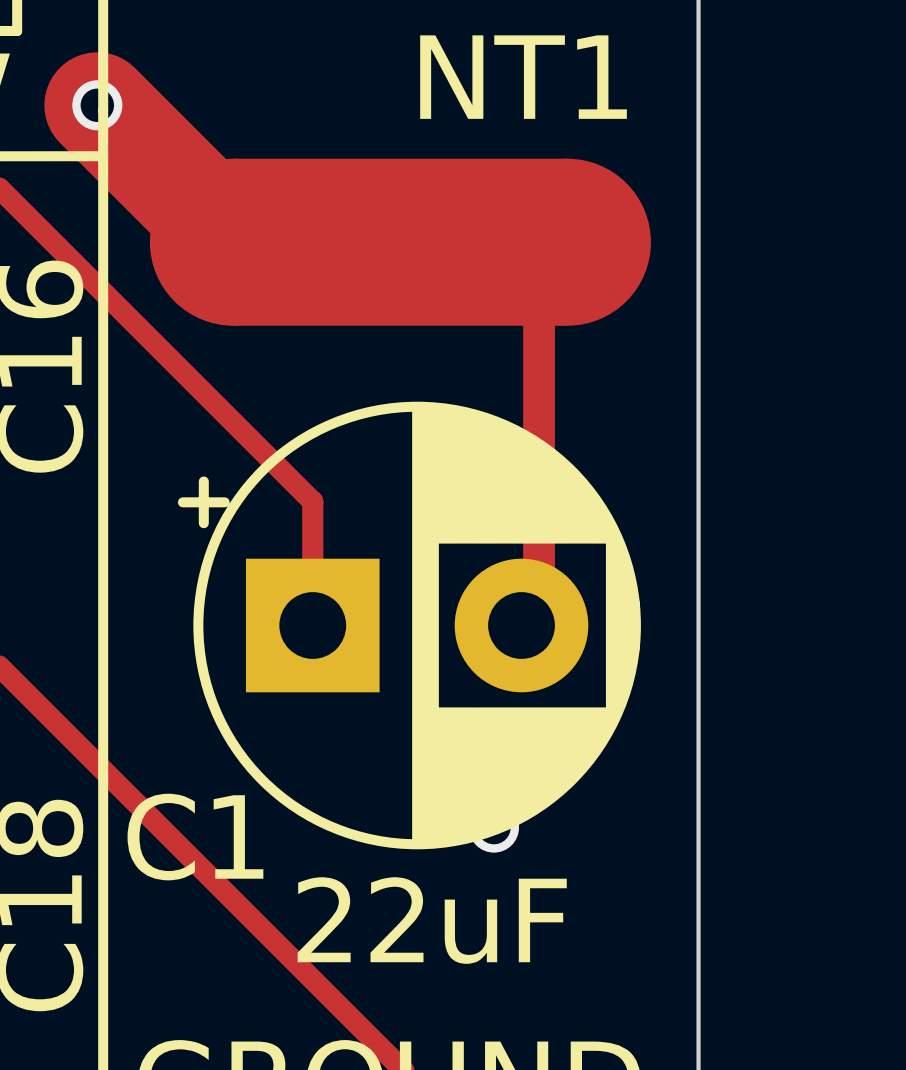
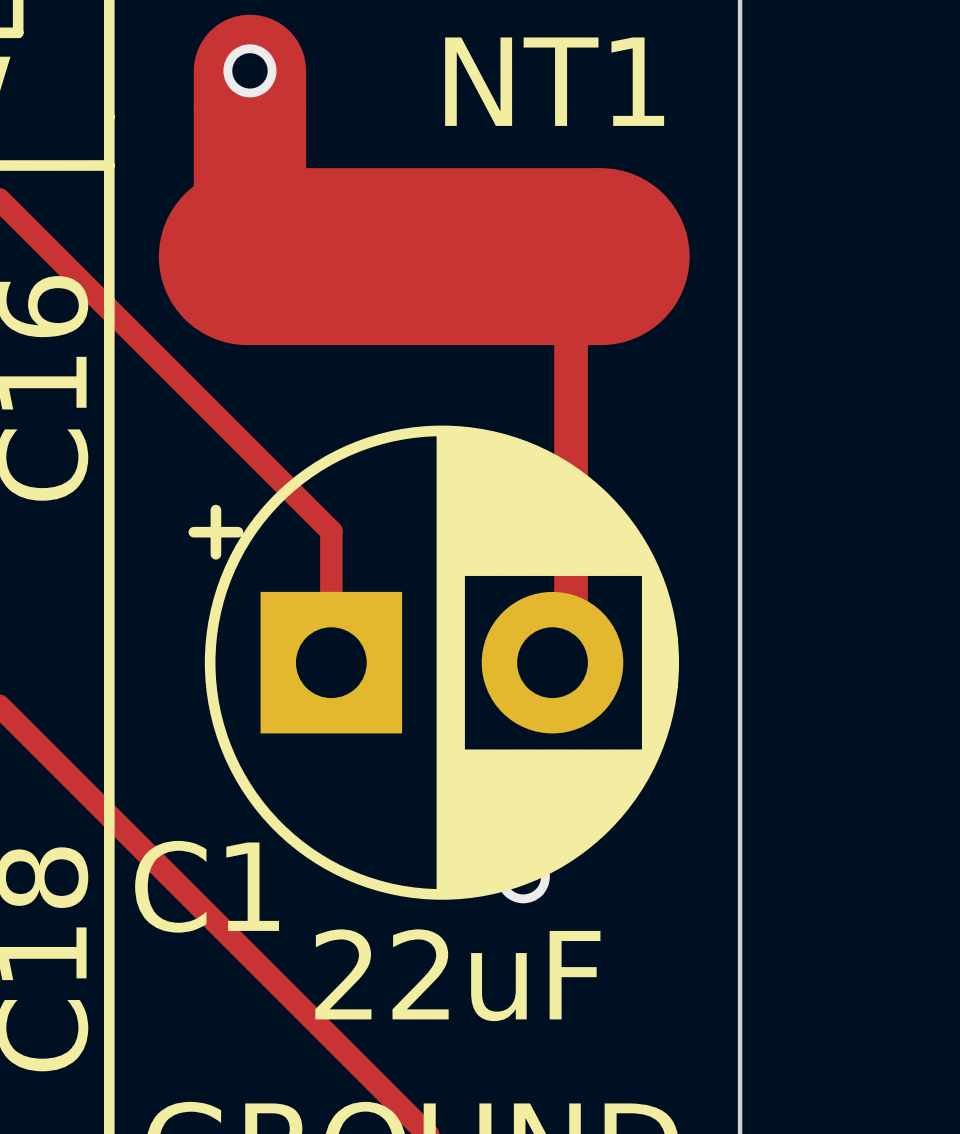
track: (97, 105) (233, 241) -> (249, 70) (249, 253) (247, 255)
via position: (97, 105) -> (249, 70)

